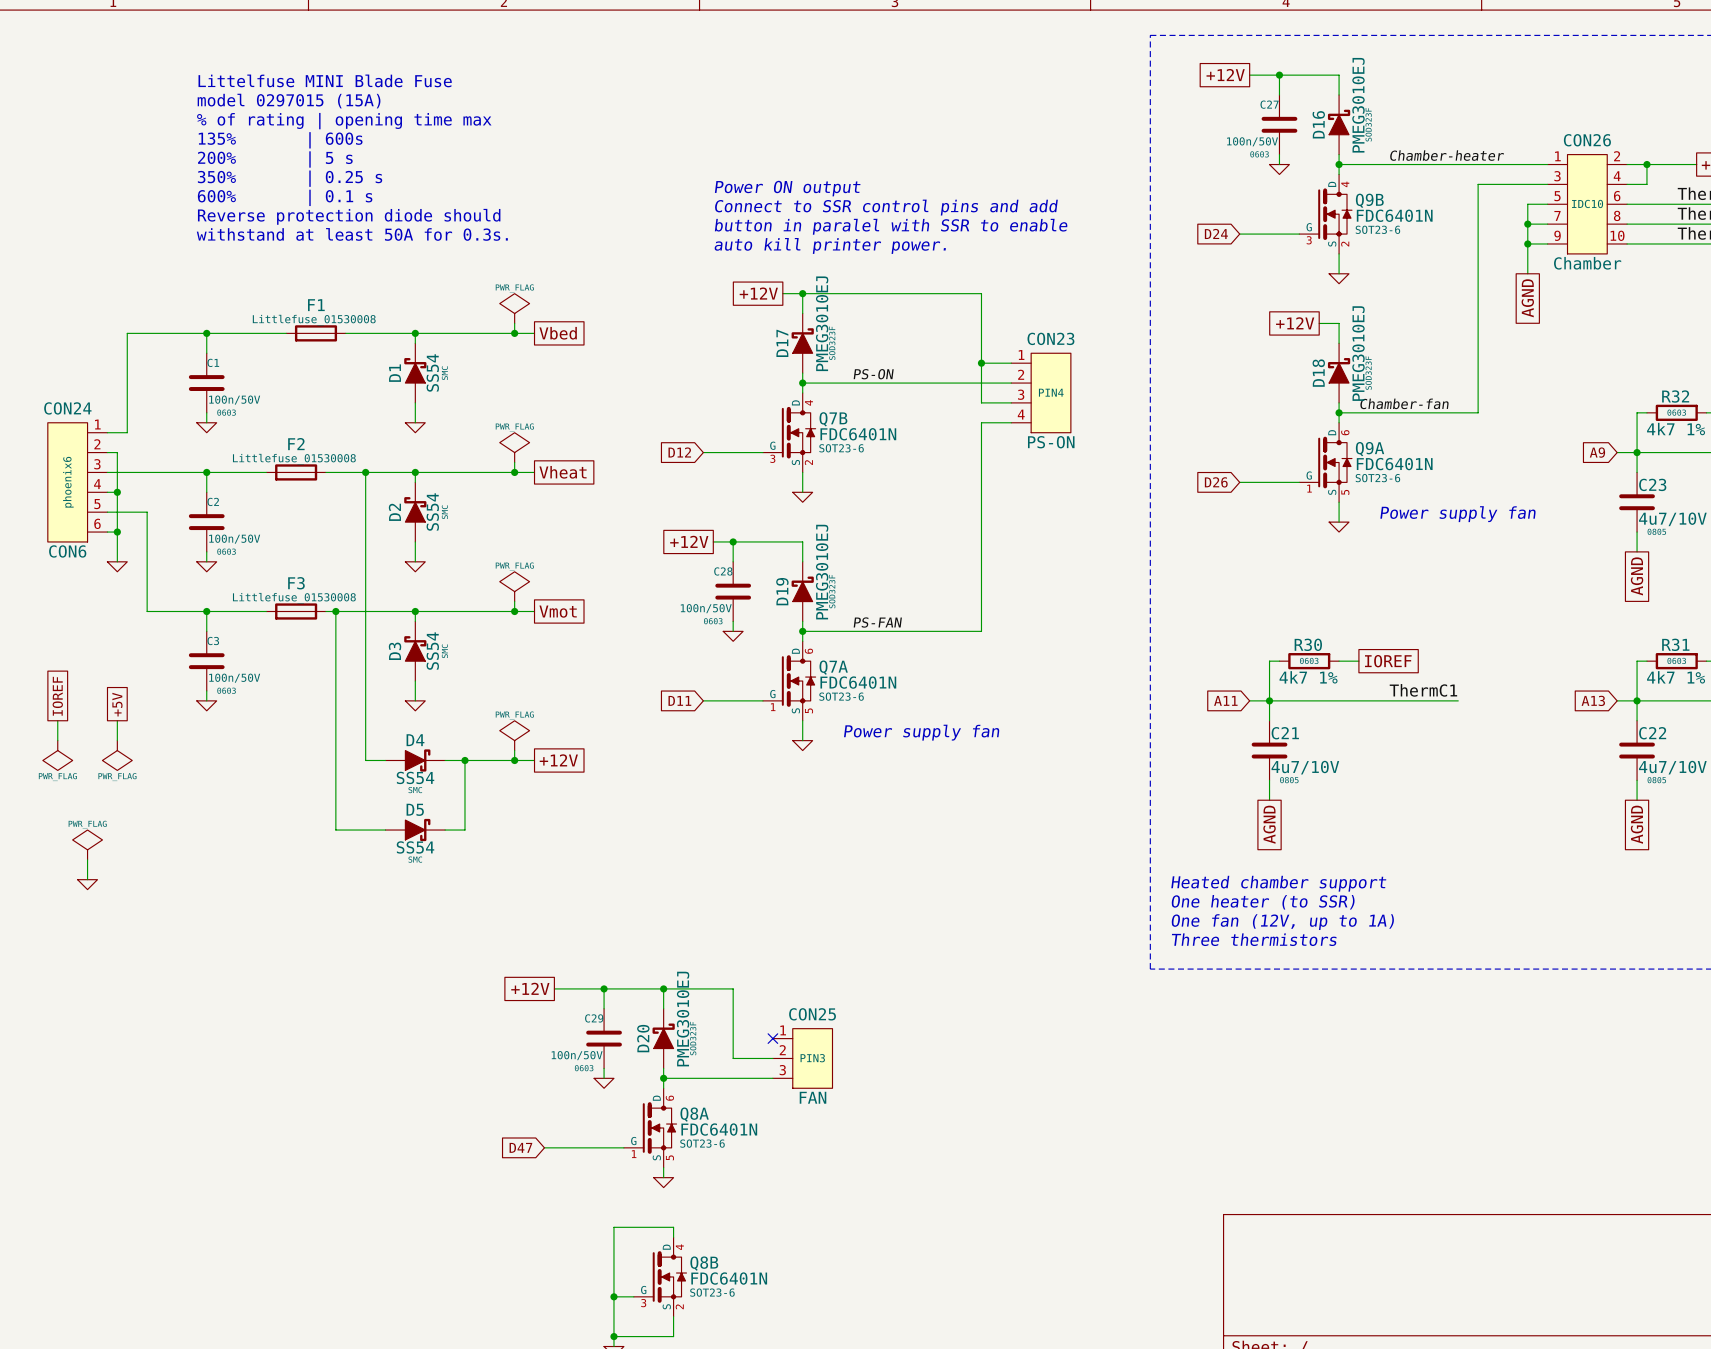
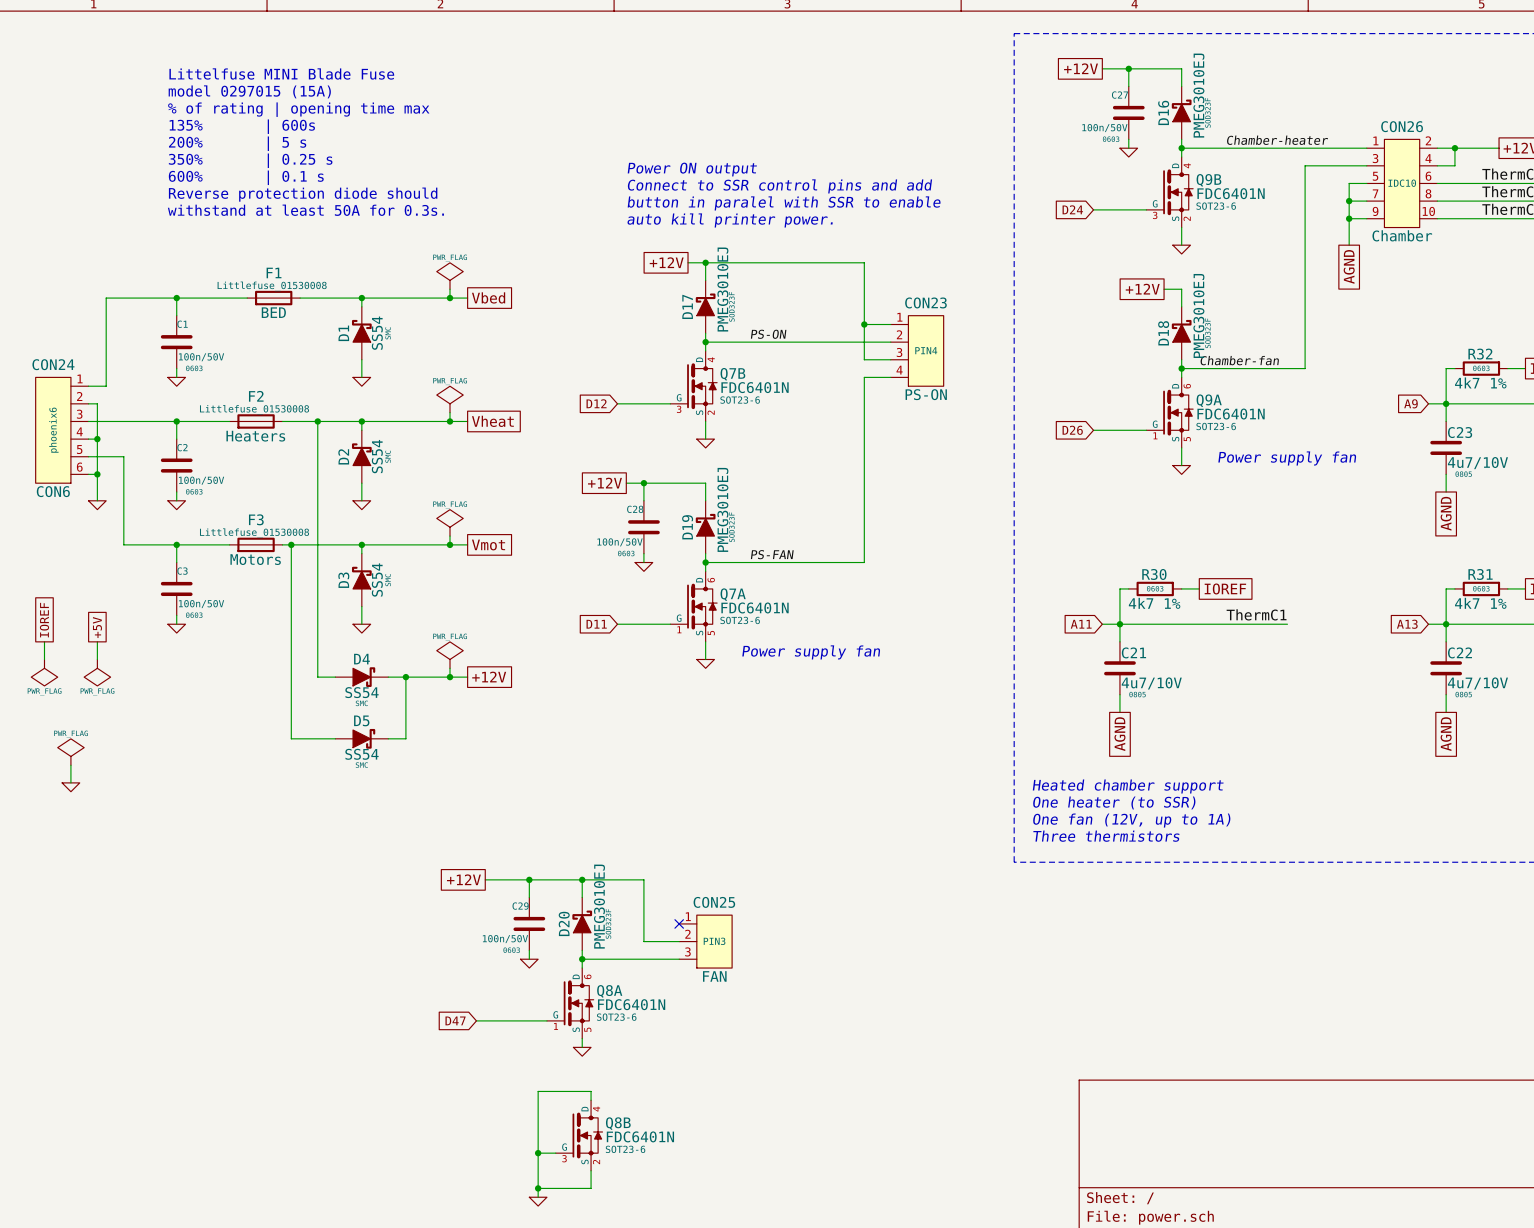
F1 value: none -> BED (273, 312)
F2 value: none -> Heaters (255, 436)
F3 value: none -> Motors (255, 559)

